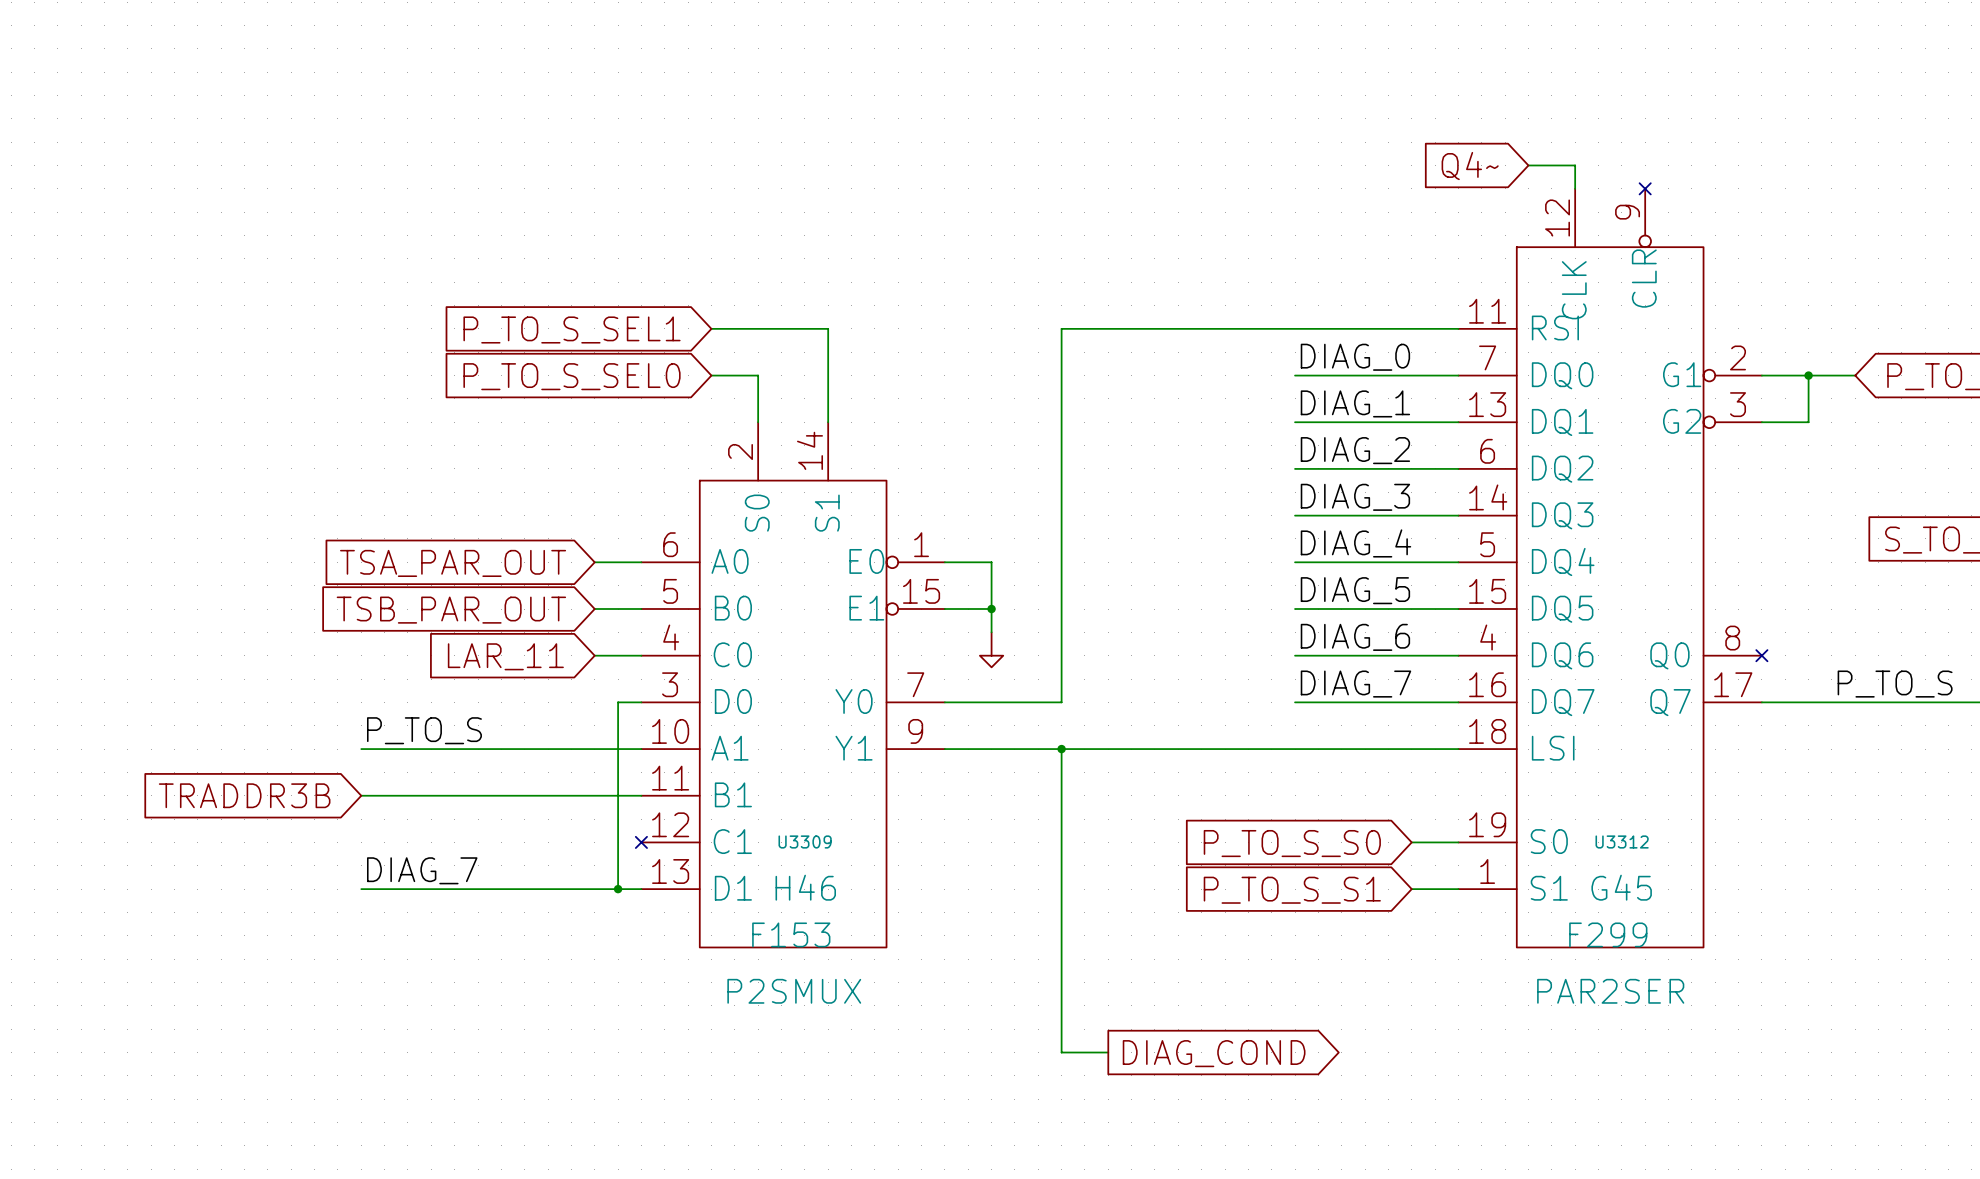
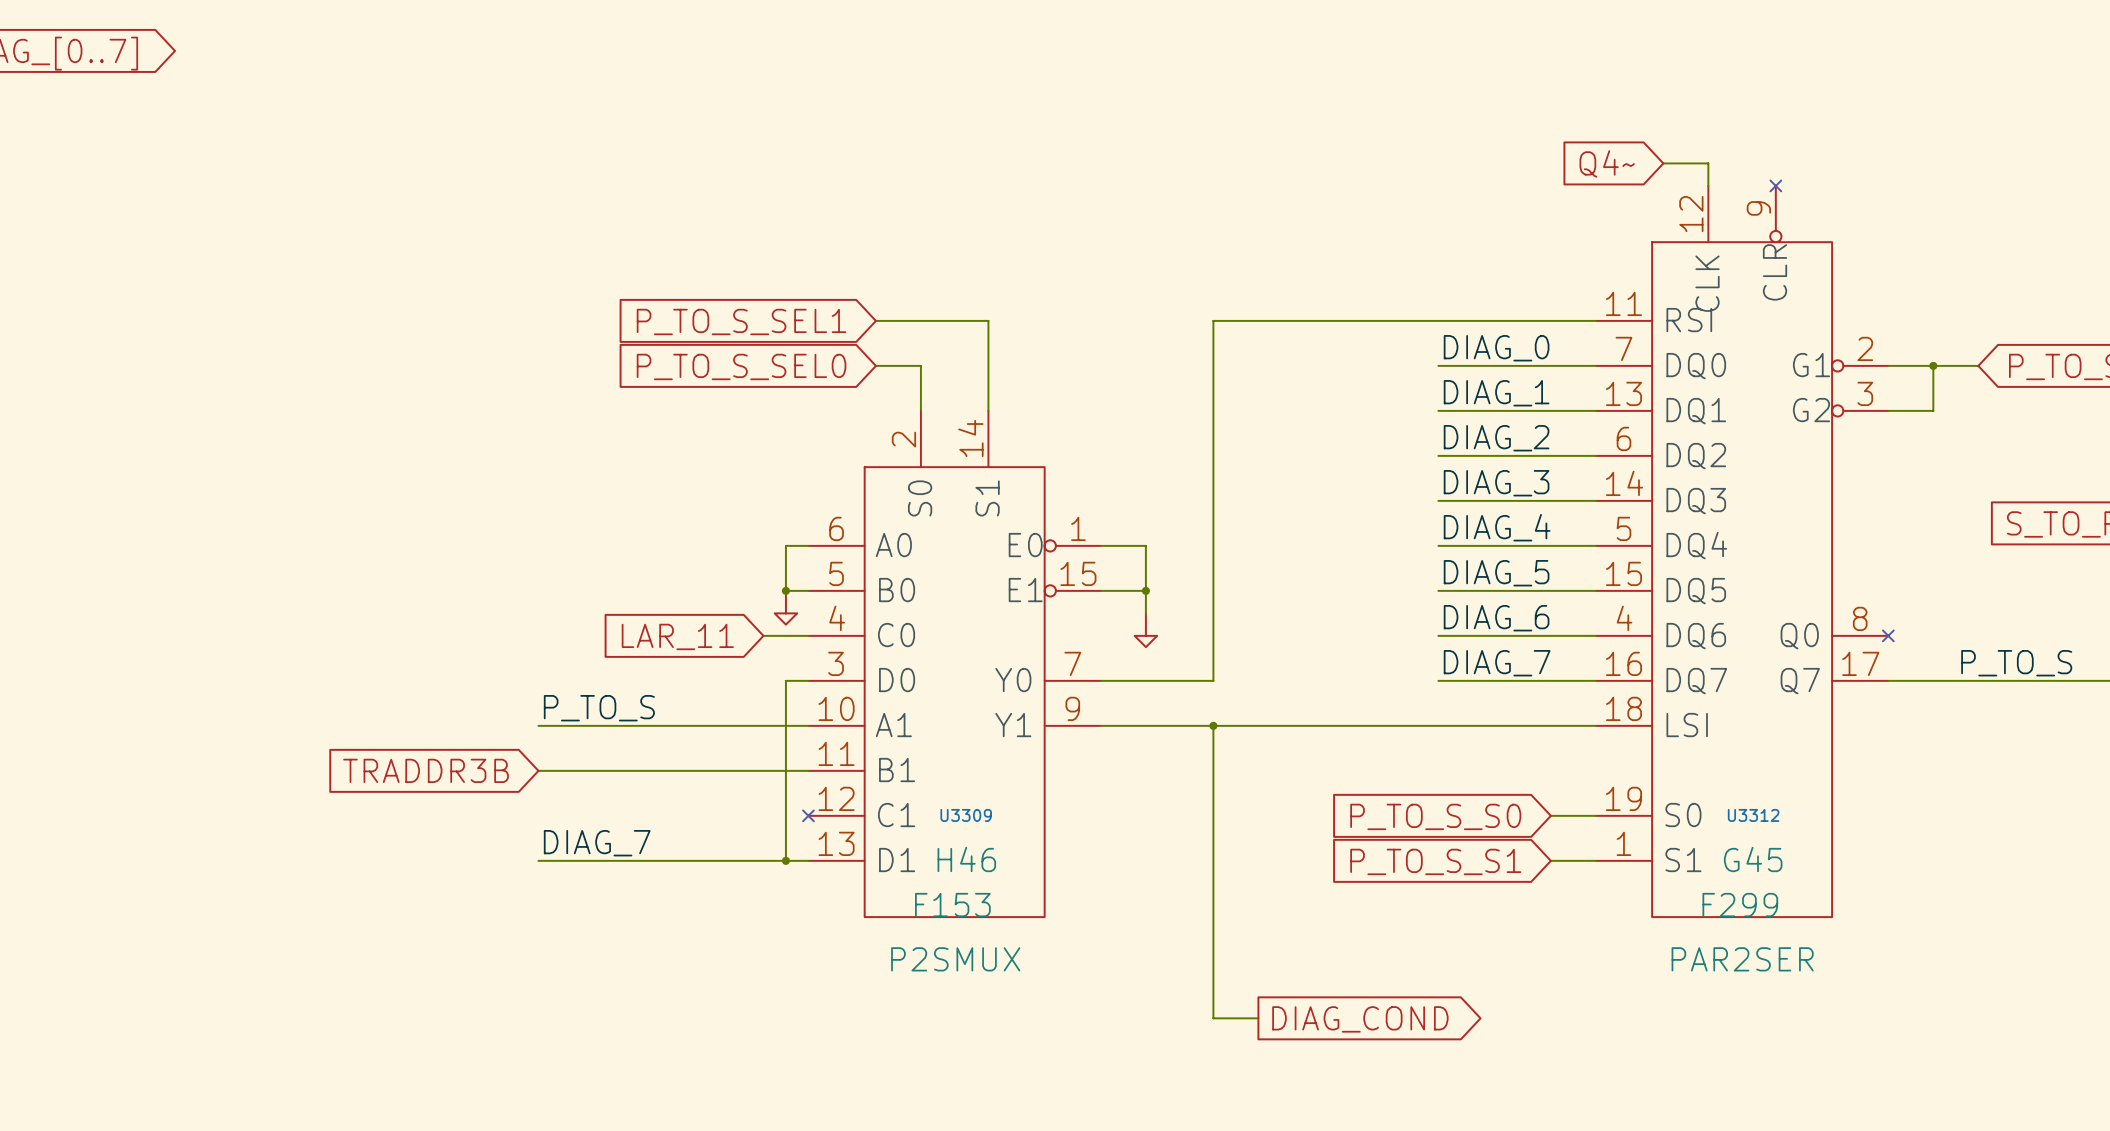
wire: (594, 562) (618, 562) -> (785, 590) (785, 545)
global label: TSA_PAR_OUT (453, 563) -> none
wire: (594, 609) (618, 609) -> none
junction: none -> (785, 590)
global label: TSB_PAR_OUT (451, 610) -> none
power symbol: none -> (785, 608)

